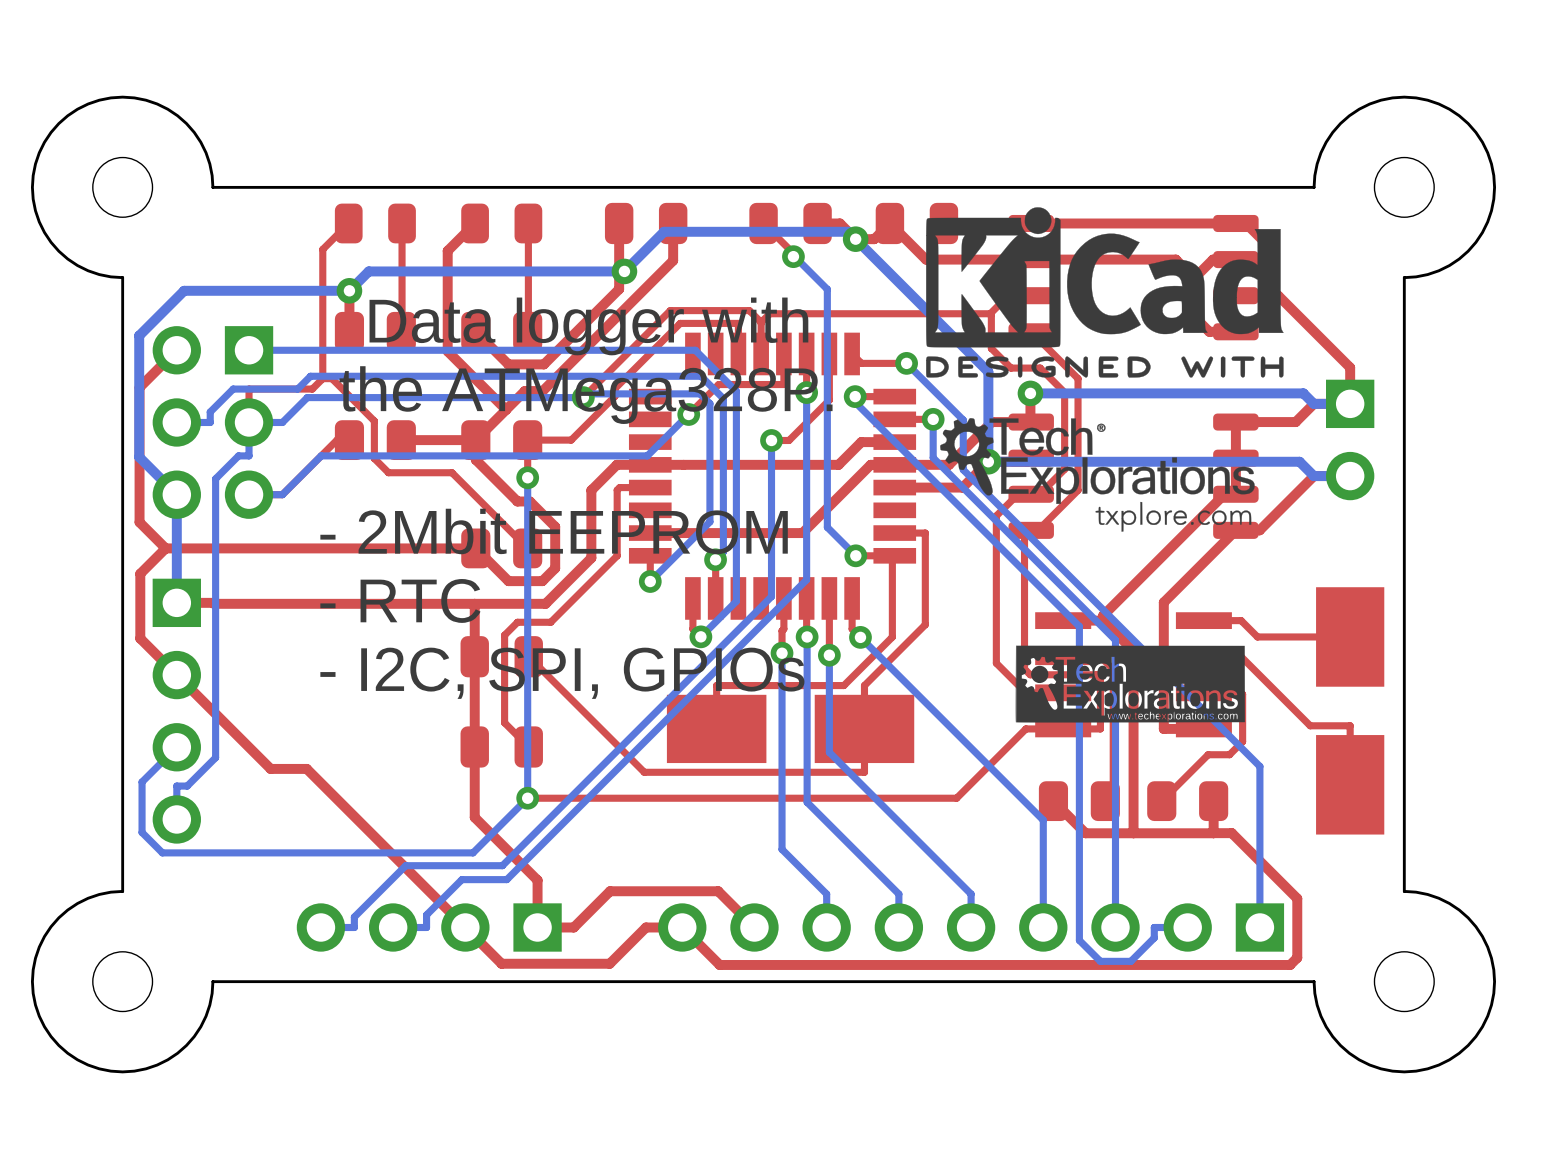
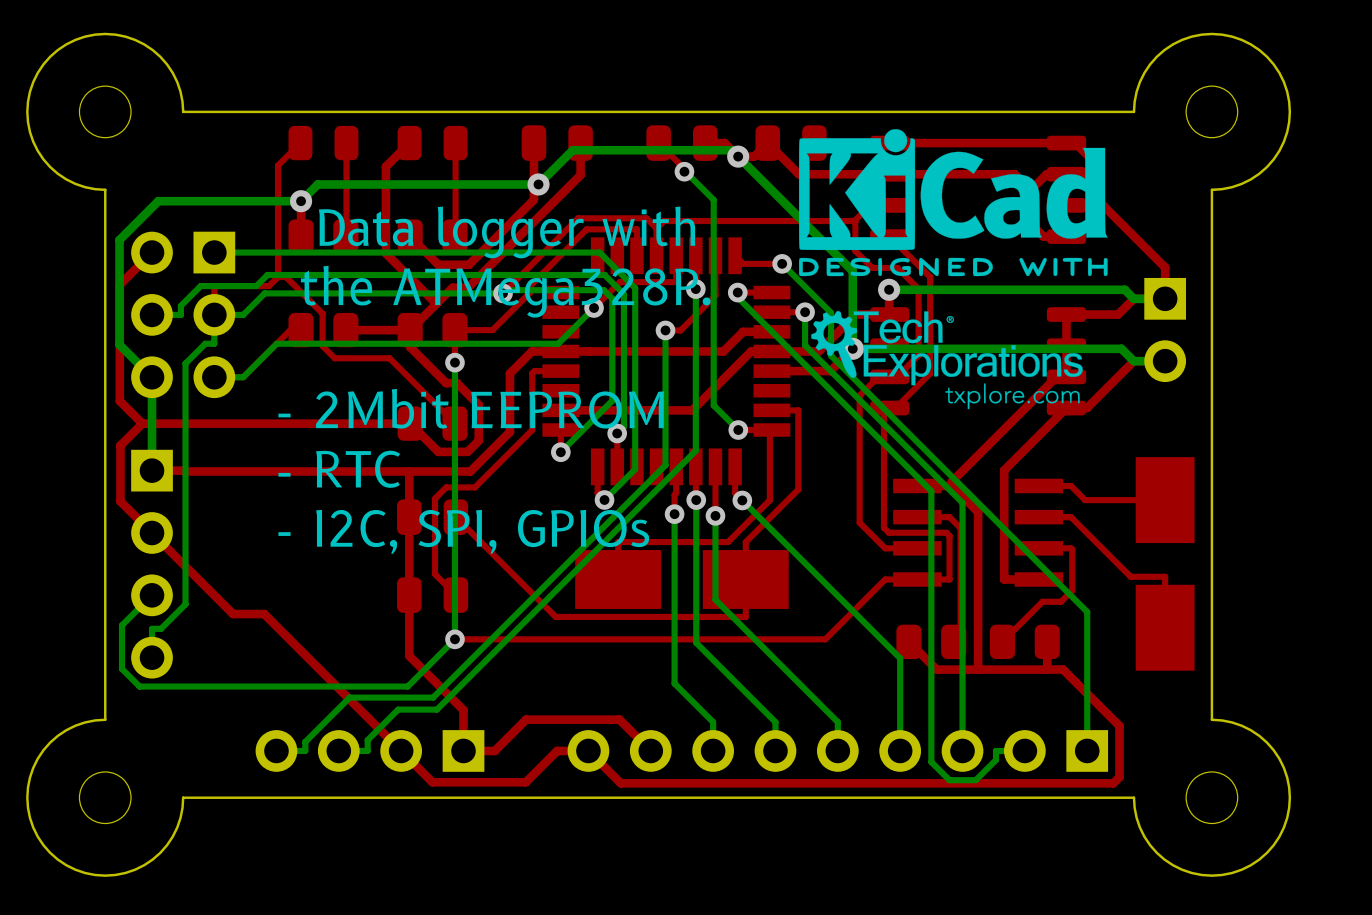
drawing: [1015, 645, 1246, 723] -> none

